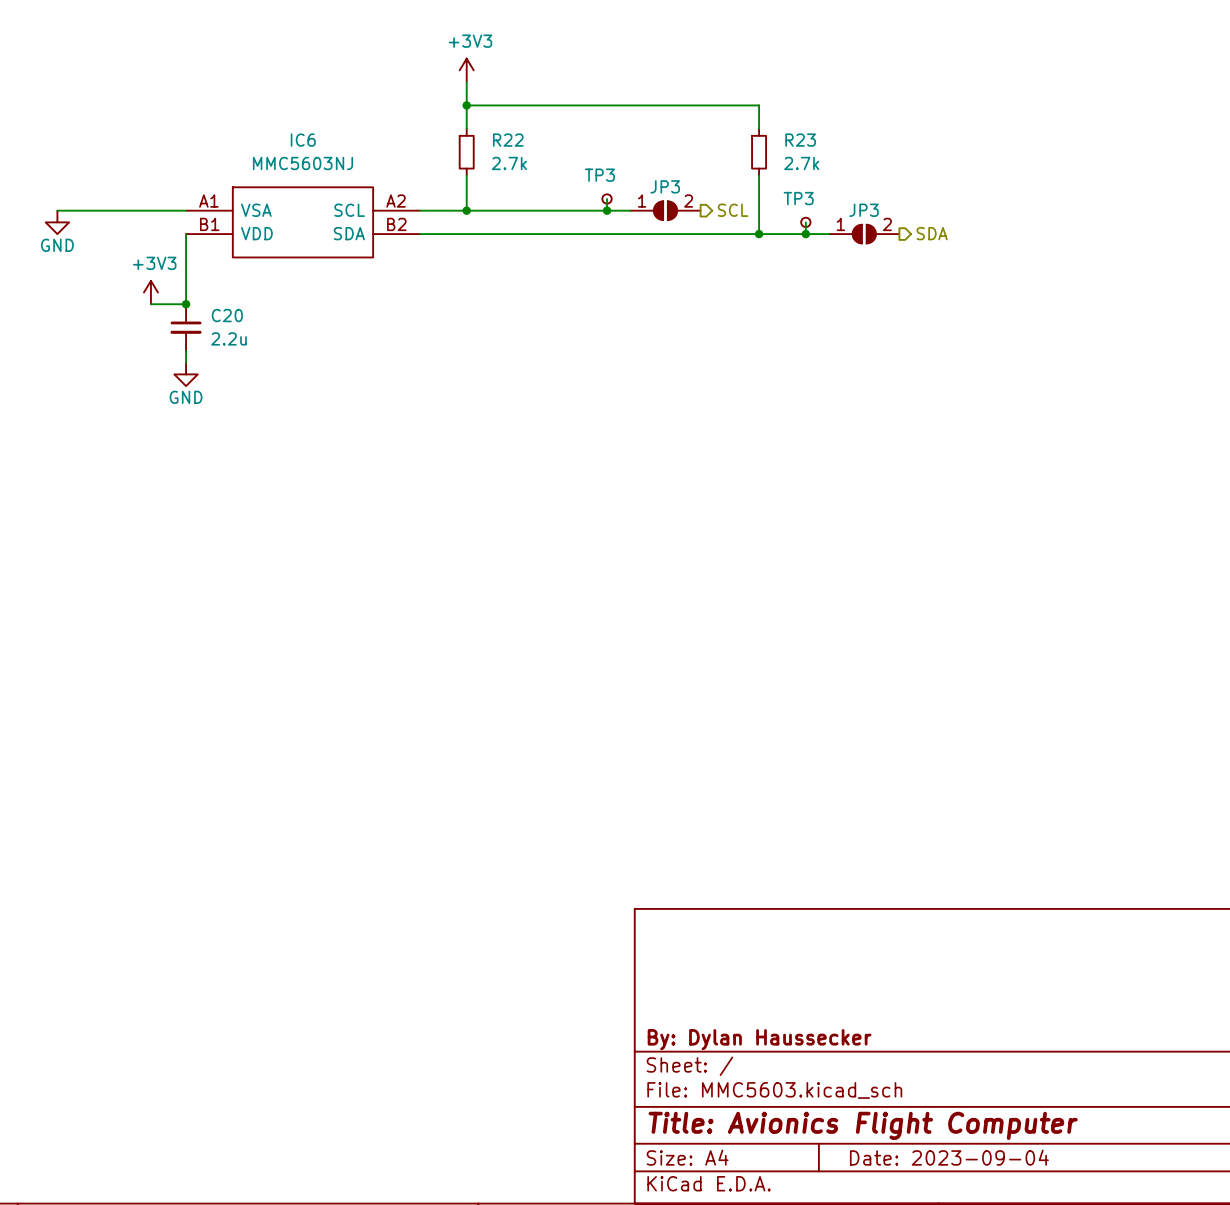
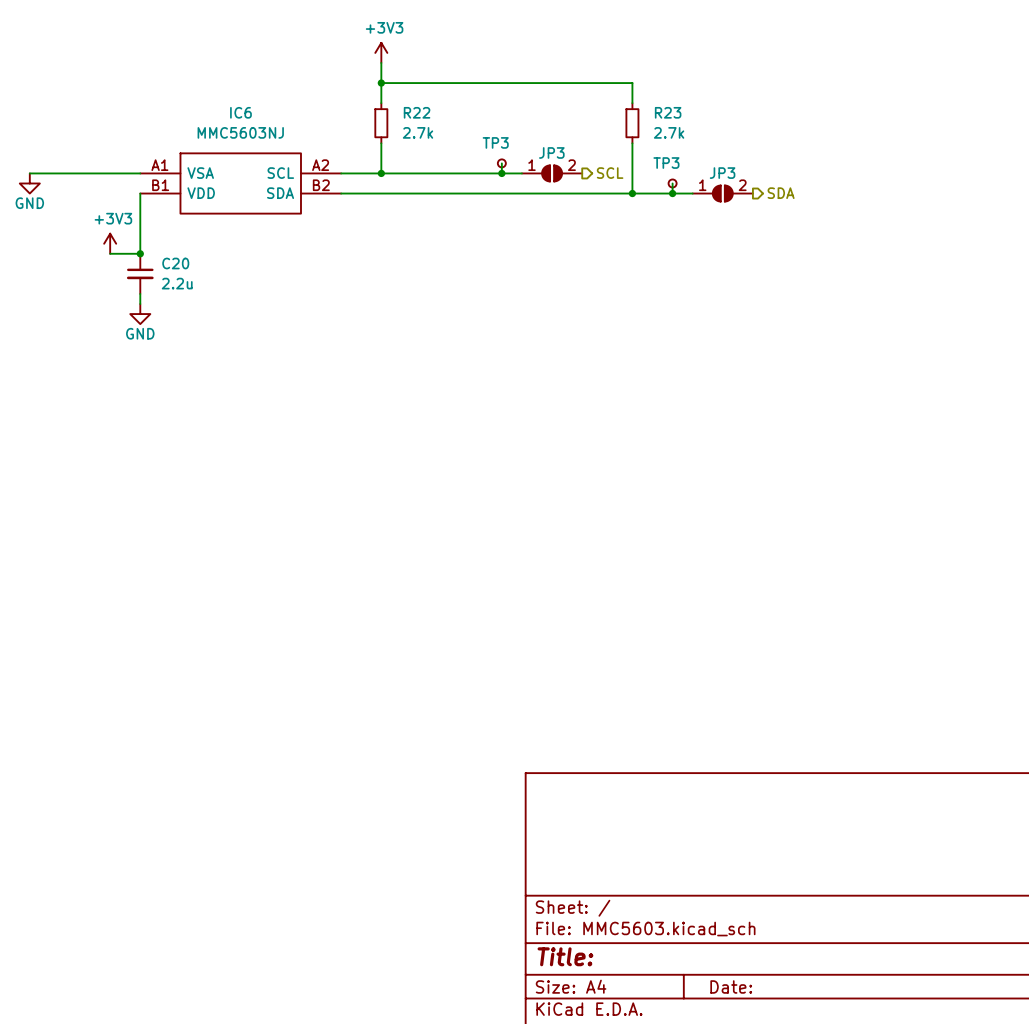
title block: By: Dylan Haussecker (759, 1039) -> none
title block: Title: Avionics Flight Computer (863, 1125) -> Title: (565, 956)
title block: Date: 2023-09-04 (949, 1157) -> Date: (731, 986)

